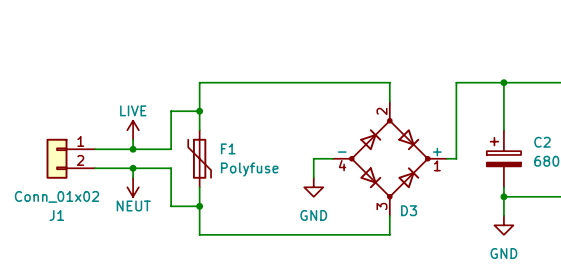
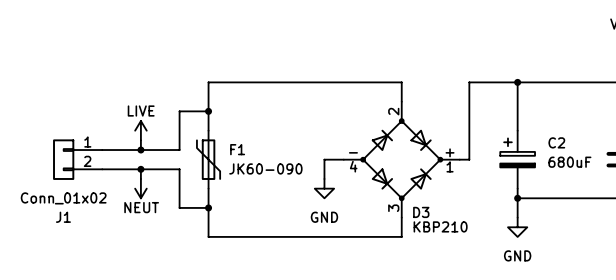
F1 value: Polyfuse (249, 169) -> JK60-090 (265, 168)
D3 value: none -> KBP210 (440, 226)

